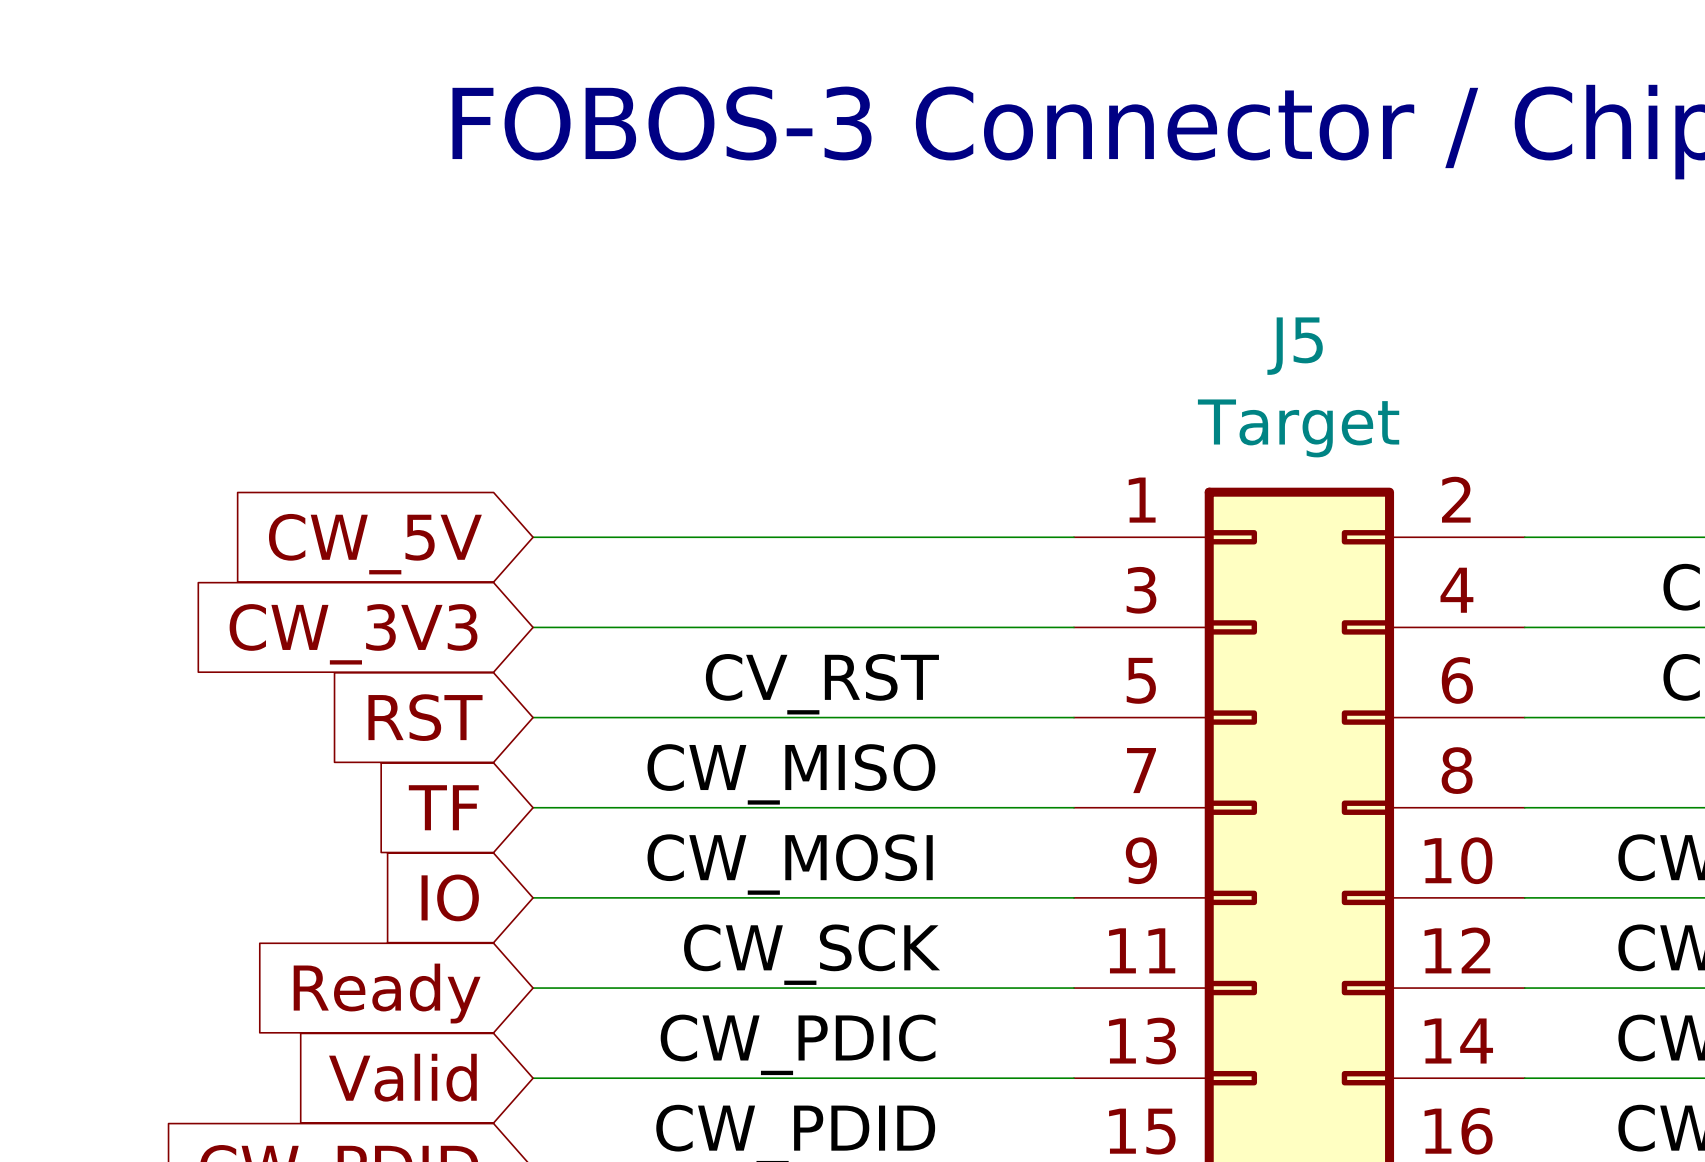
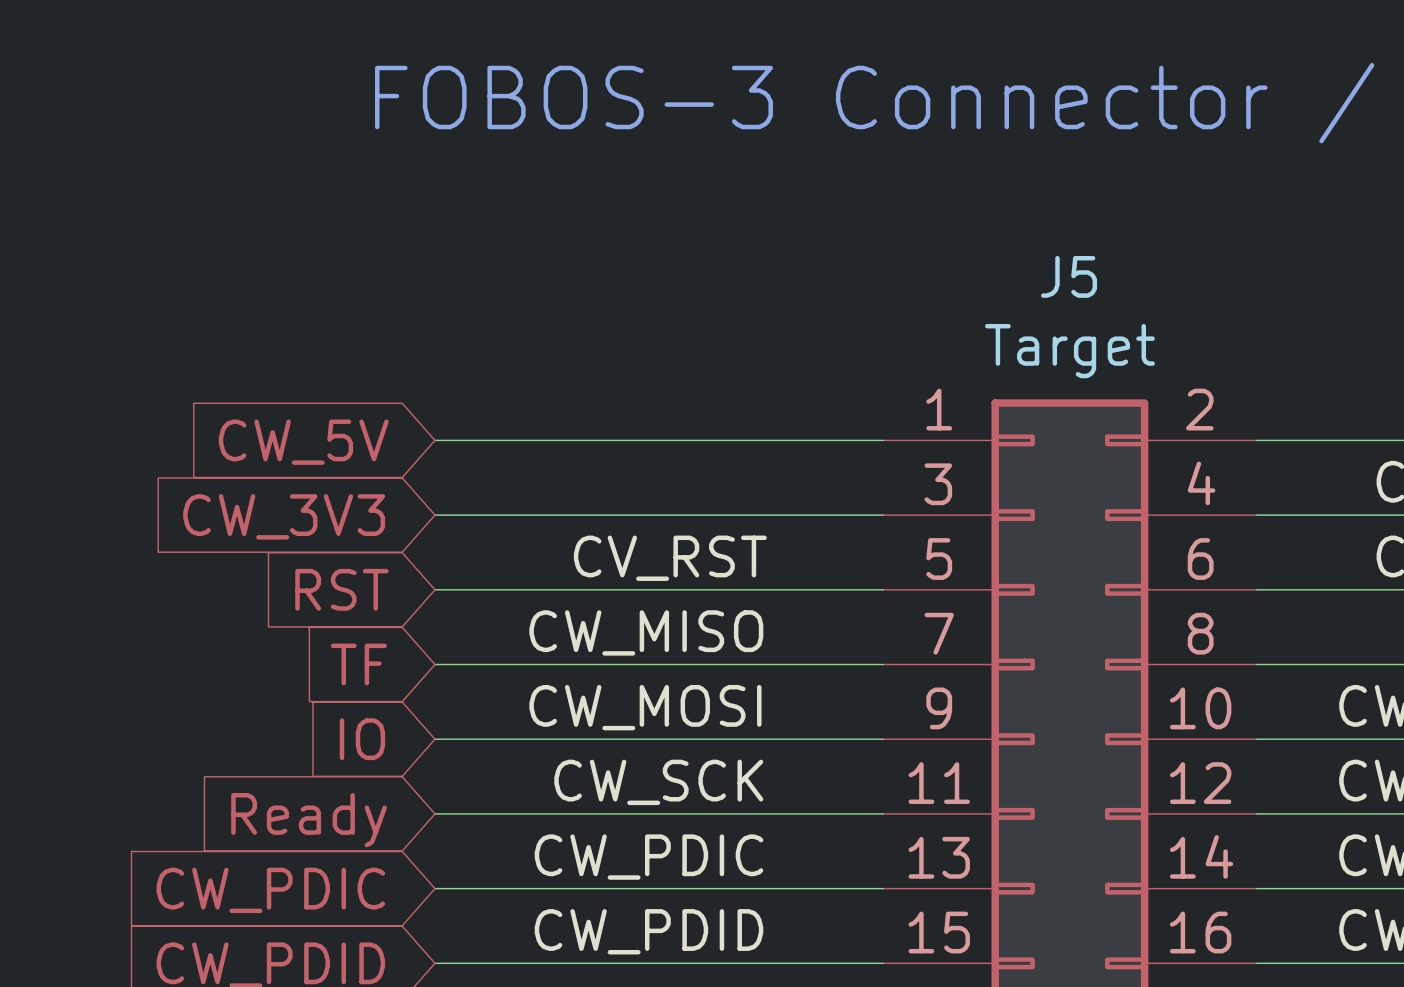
global label: Valid (402, 1077) -> CW_PDIC (270, 890)

